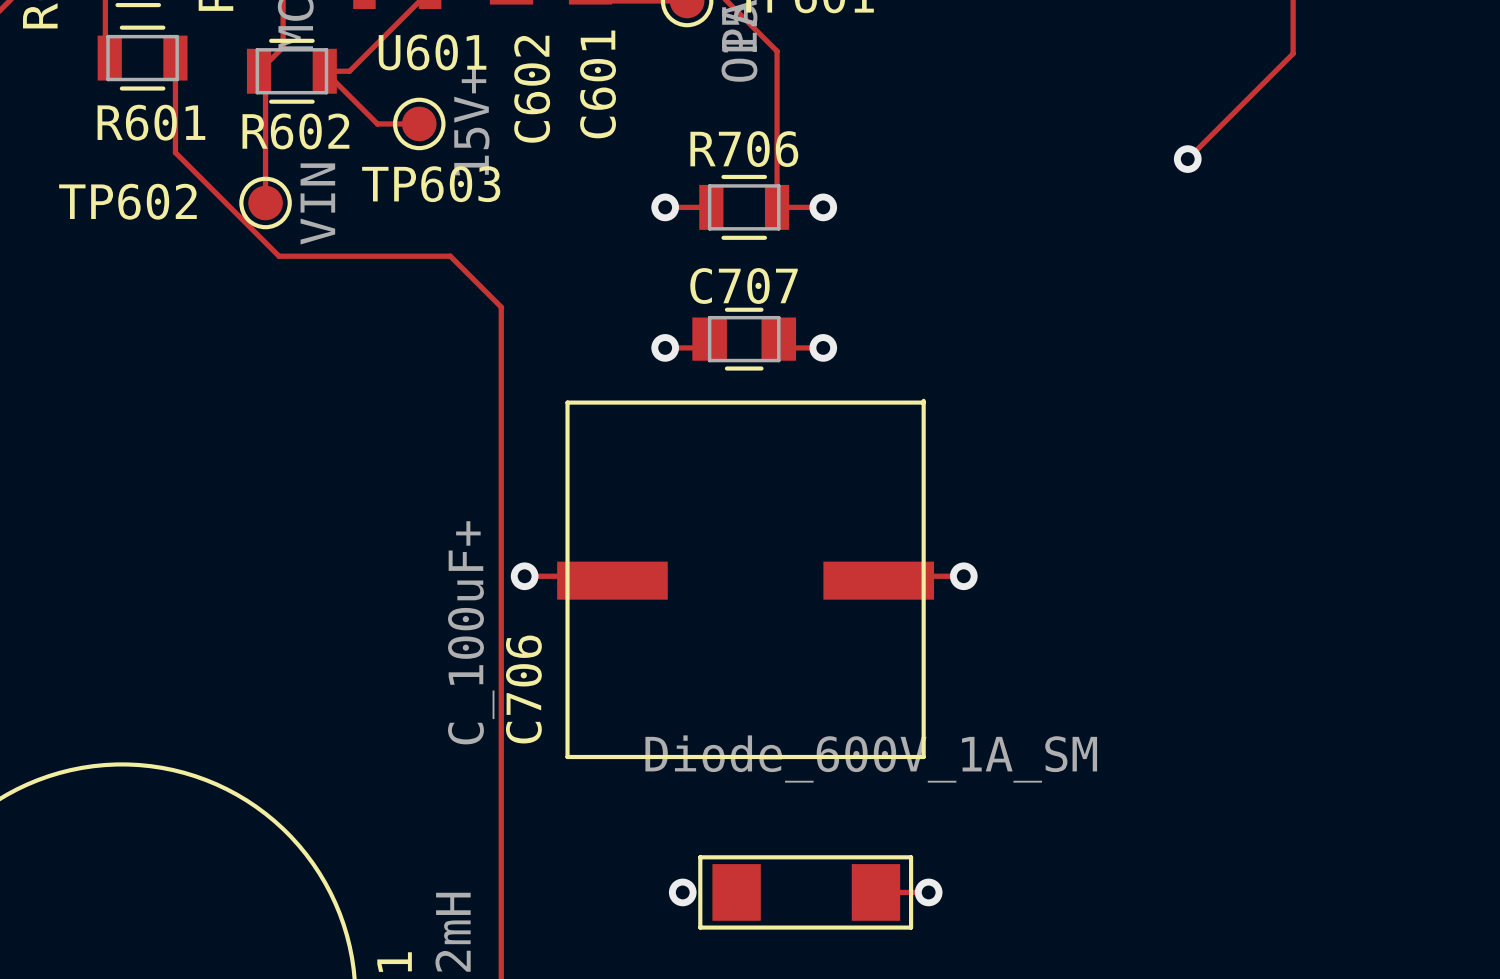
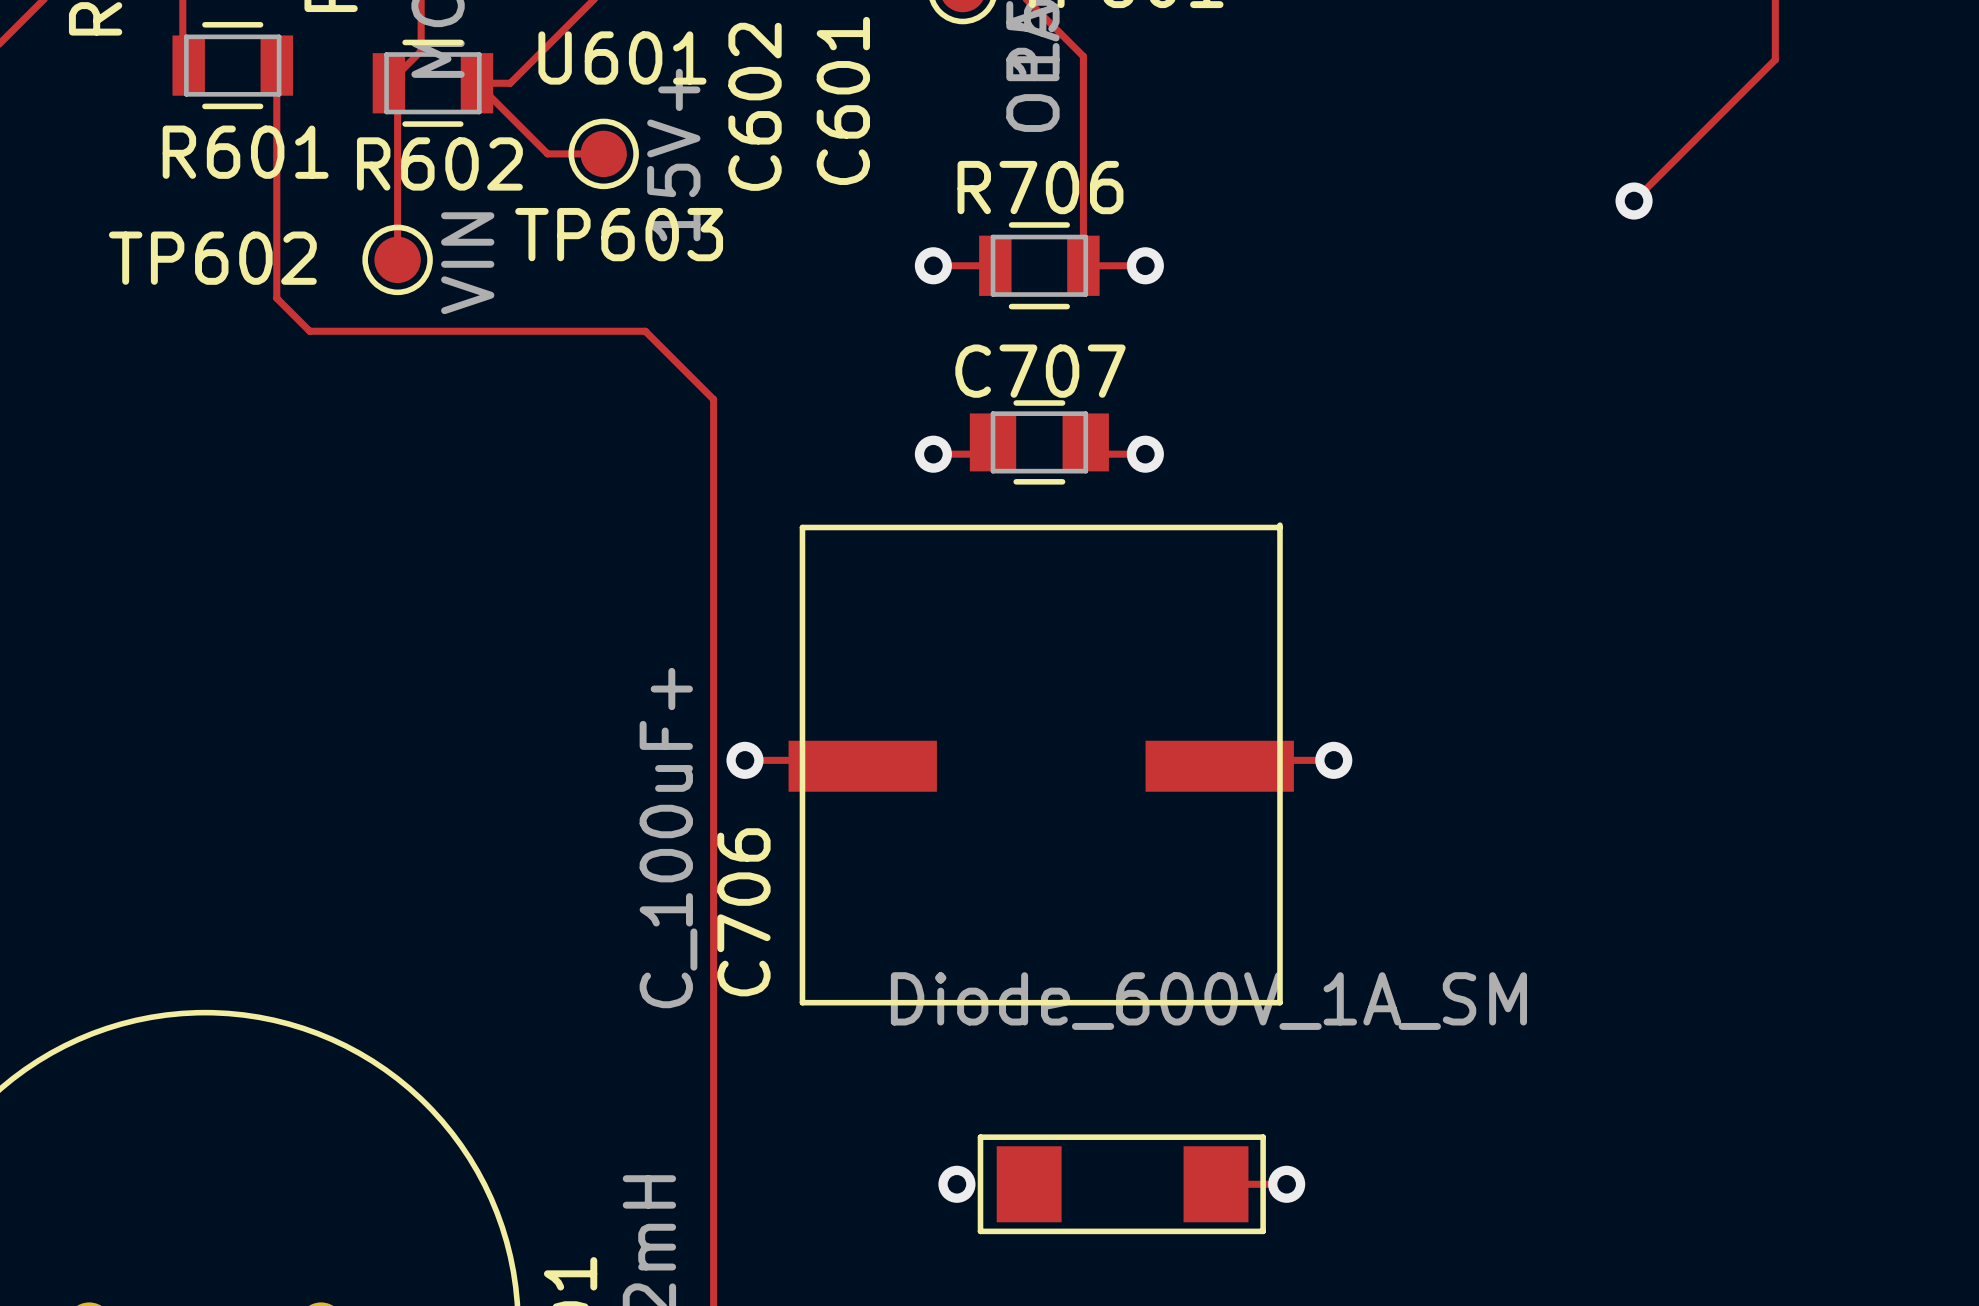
track: (175, 152) (279, 256) -> (276, 192) (276, 298) (309, 331) (415, 331)

